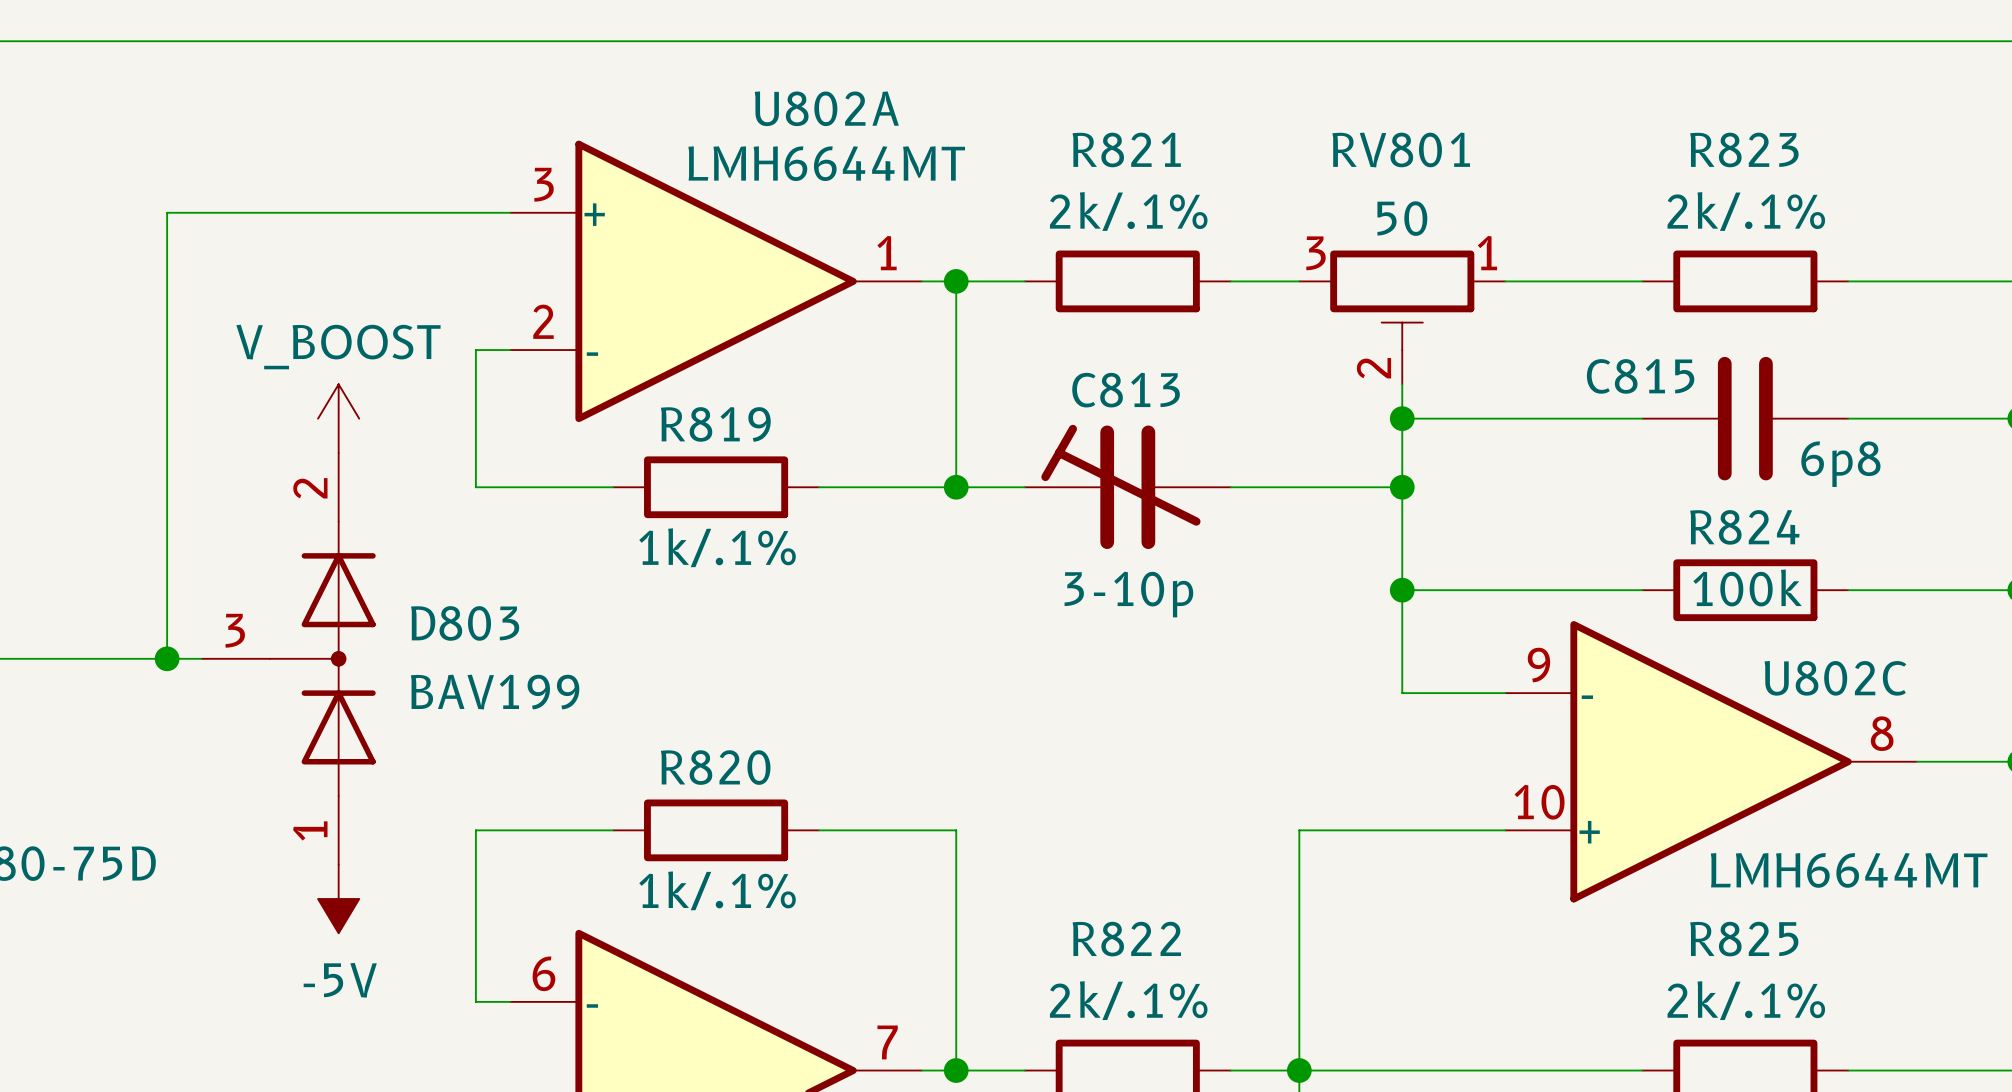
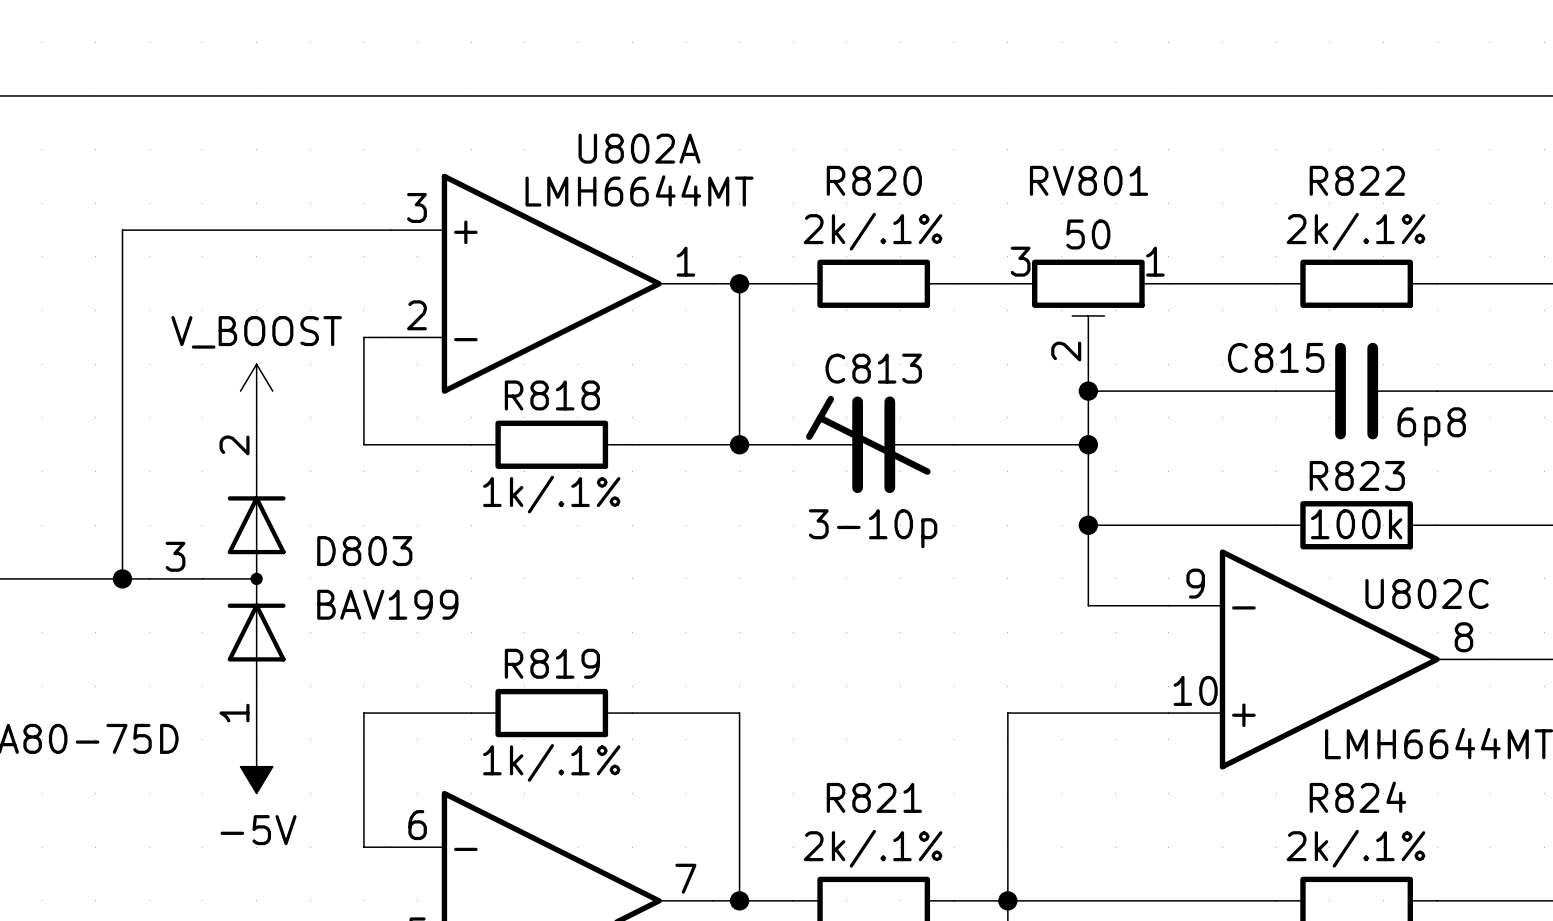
R821 name: R821 (1126, 149) -> R820 (874, 180)
R823 name: R823 (1744, 149) -> R822 (1357, 180)
R819 name: R819 (715, 424) -> R818 (552, 395)
R824 name: R824 (1744, 527) -> R823 (1357, 475)
R820 name: R820 (715, 767) -> R819 (552, 663)
R822 name: R822 (1126, 939) -> R821 (874, 797)
R825 name: R825 (1744, 939) -> R824 (1357, 797)

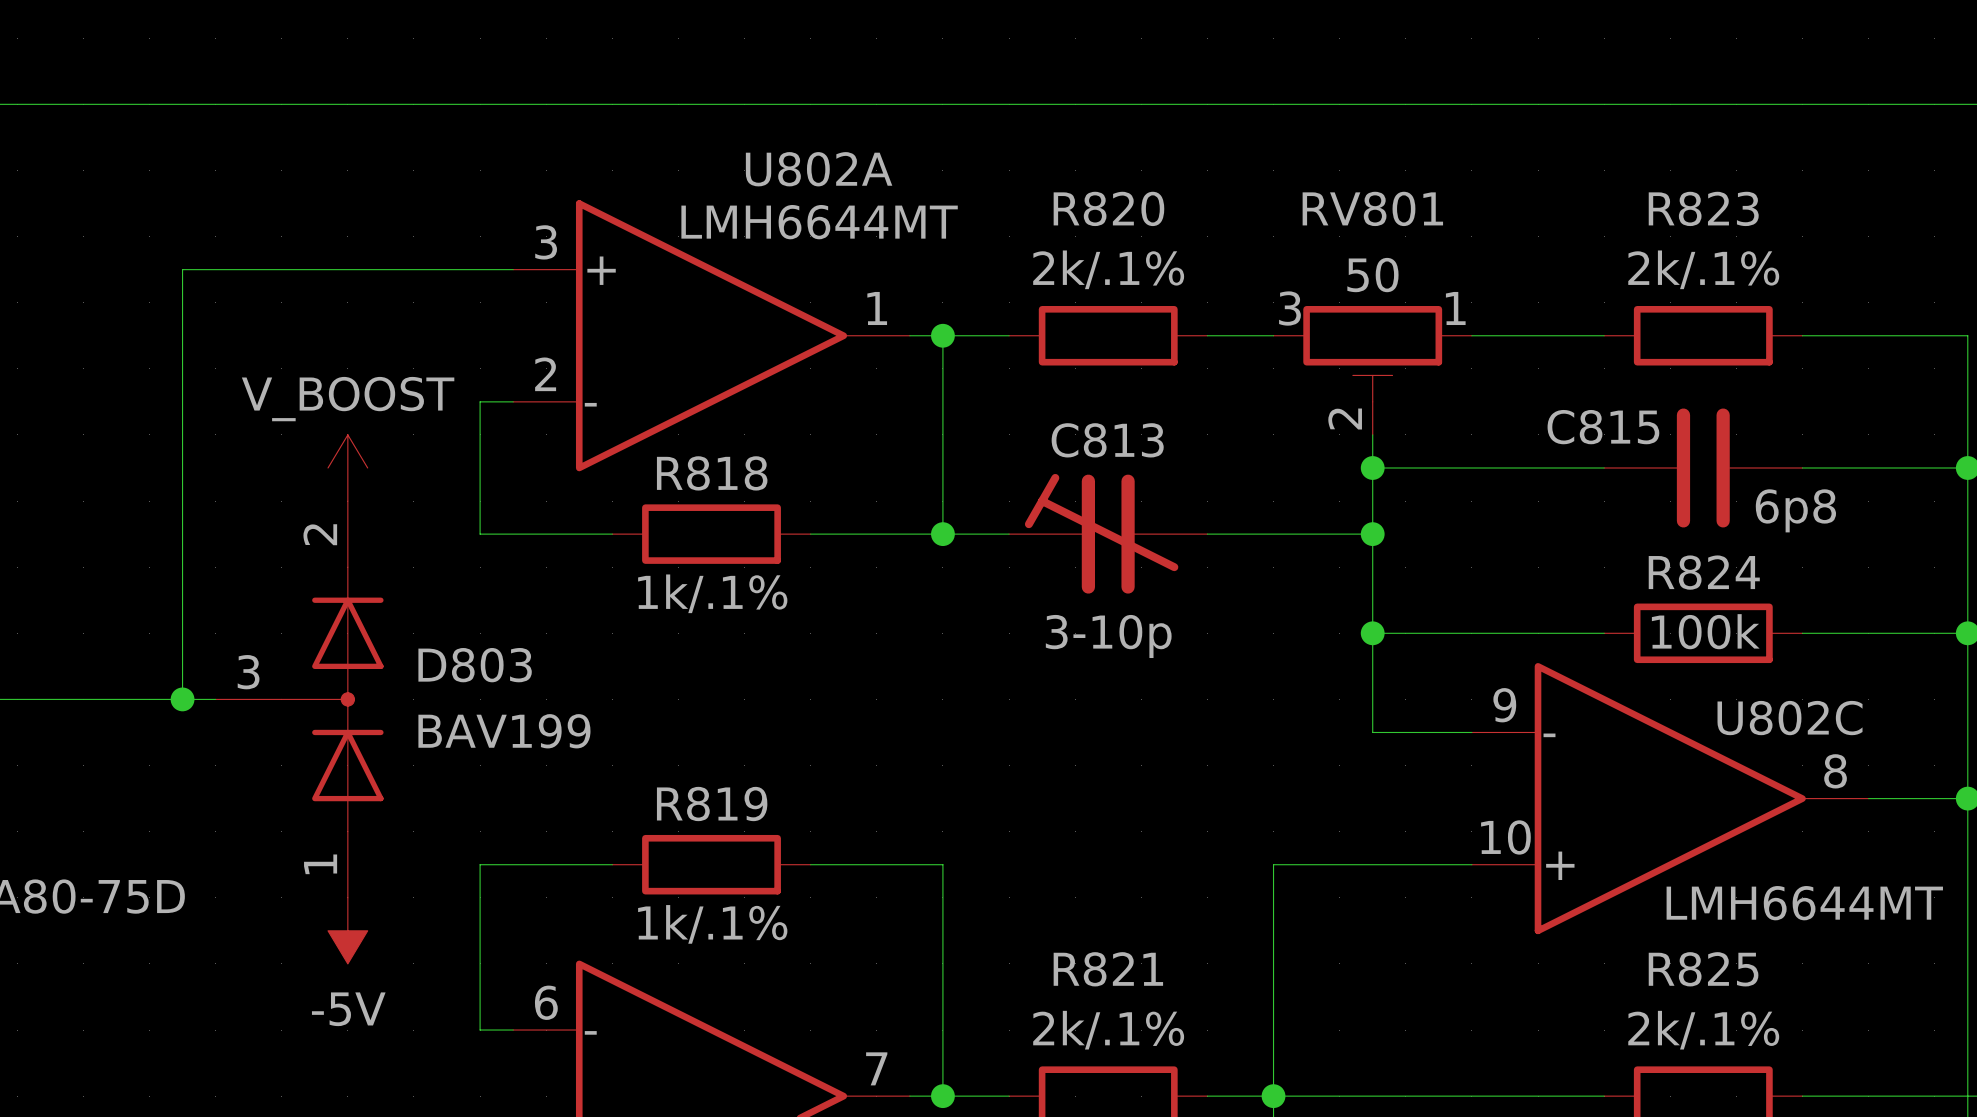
R822 name: R822 (1357, 180) -> R823 (1703, 208)
R823 name: R823 (1357, 475) -> R824 (1704, 572)
R824 name: R824 (1357, 797) -> R825 (1703, 969)

